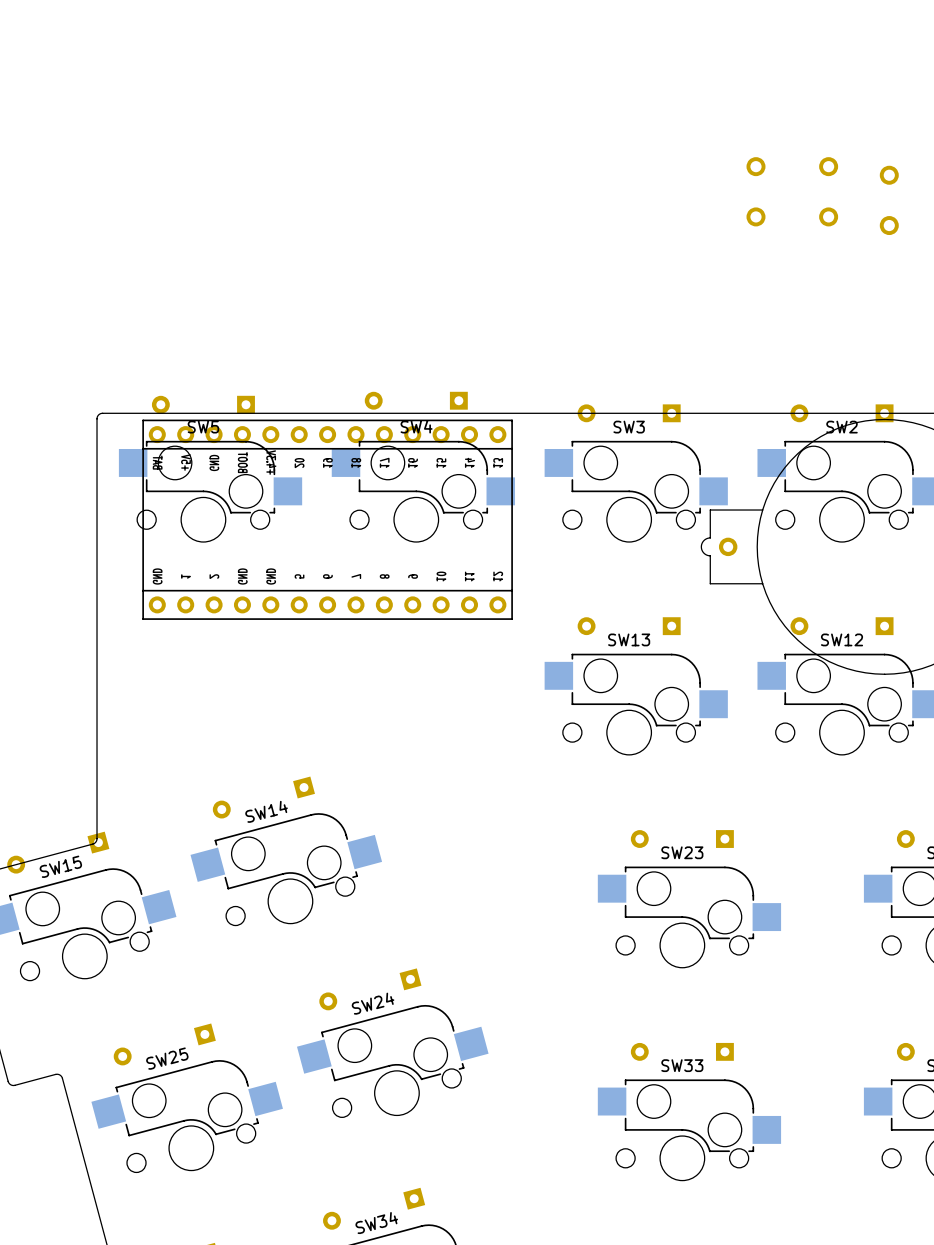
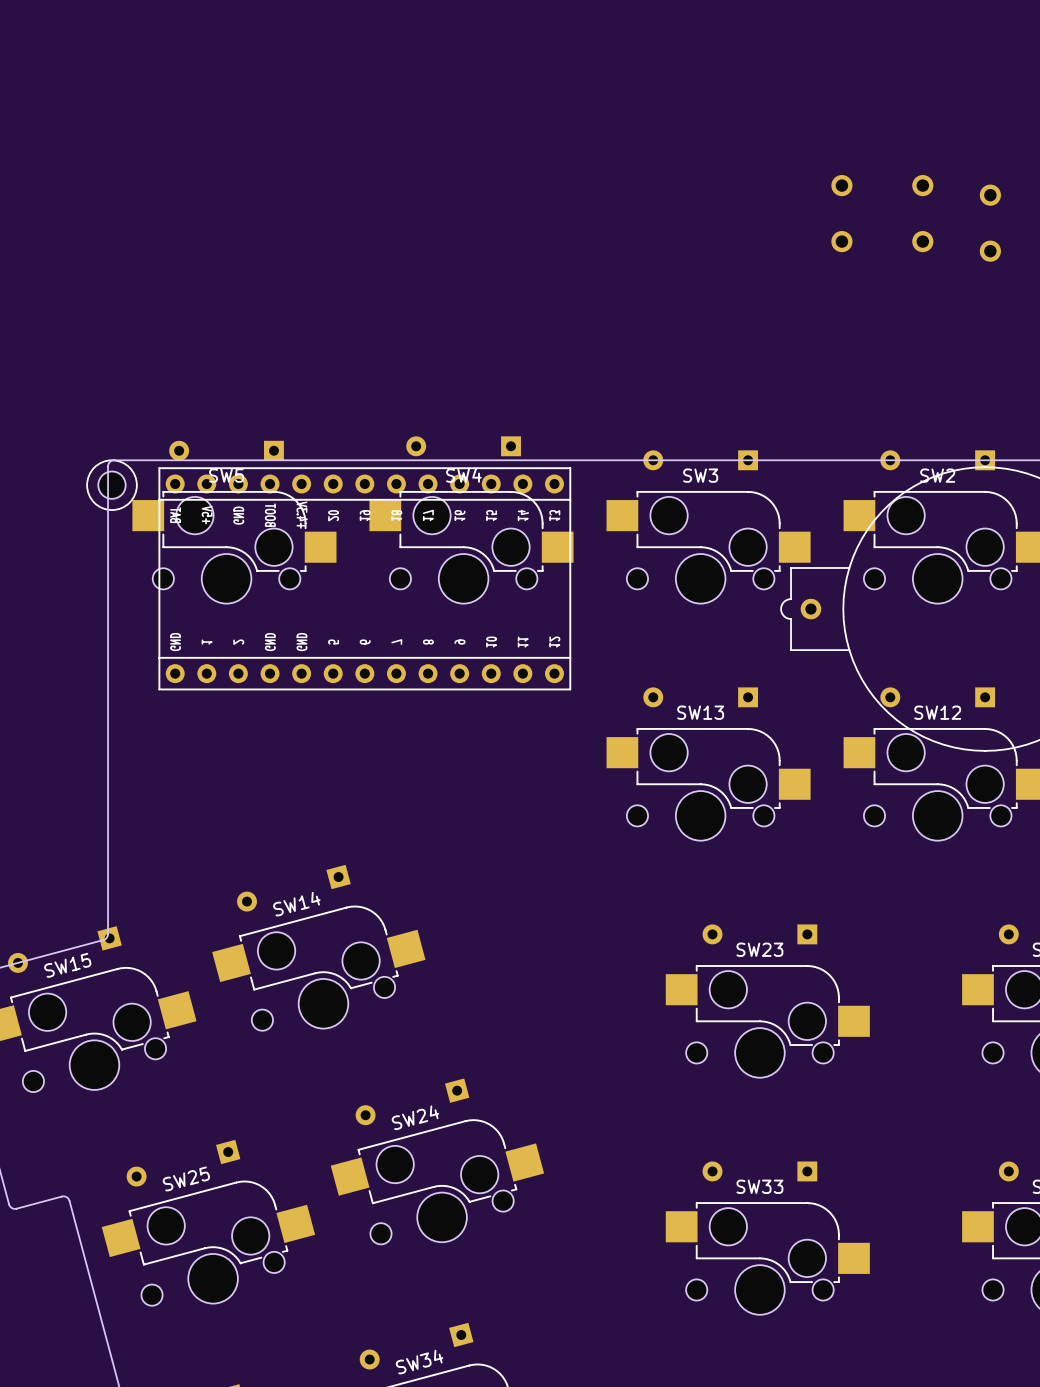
part: none -> (111, 485)

